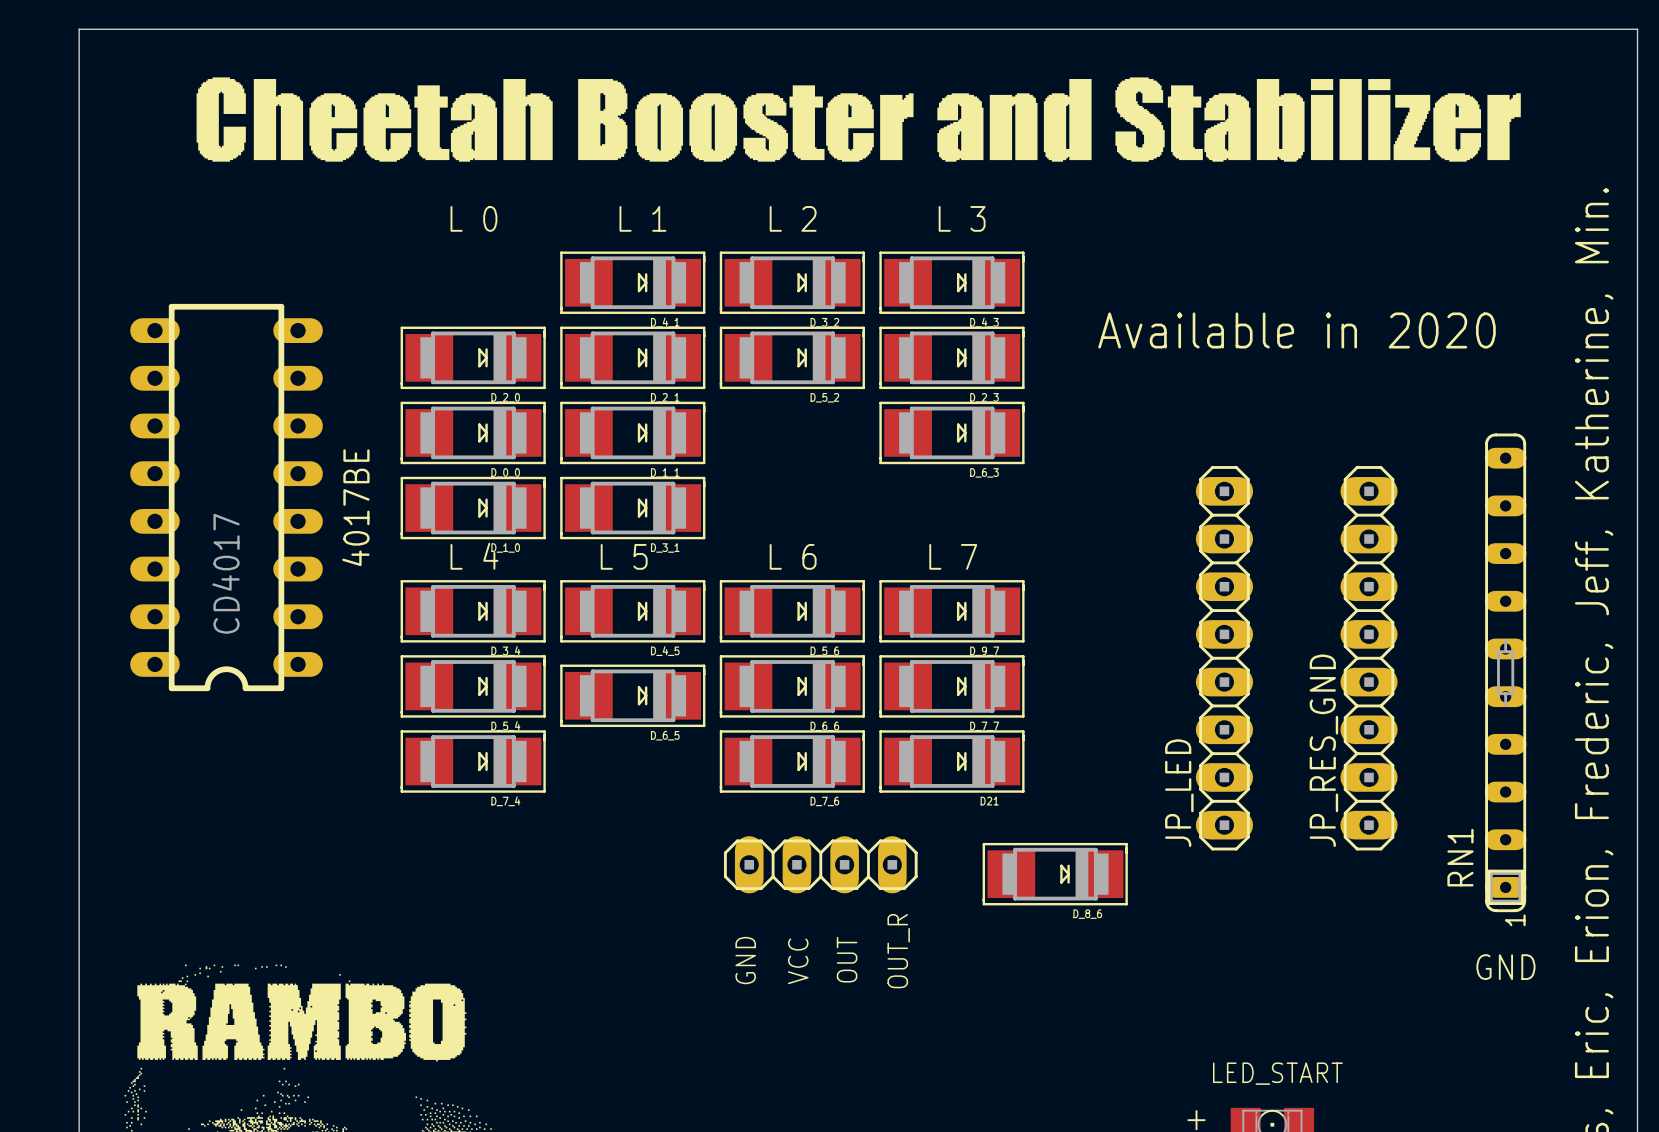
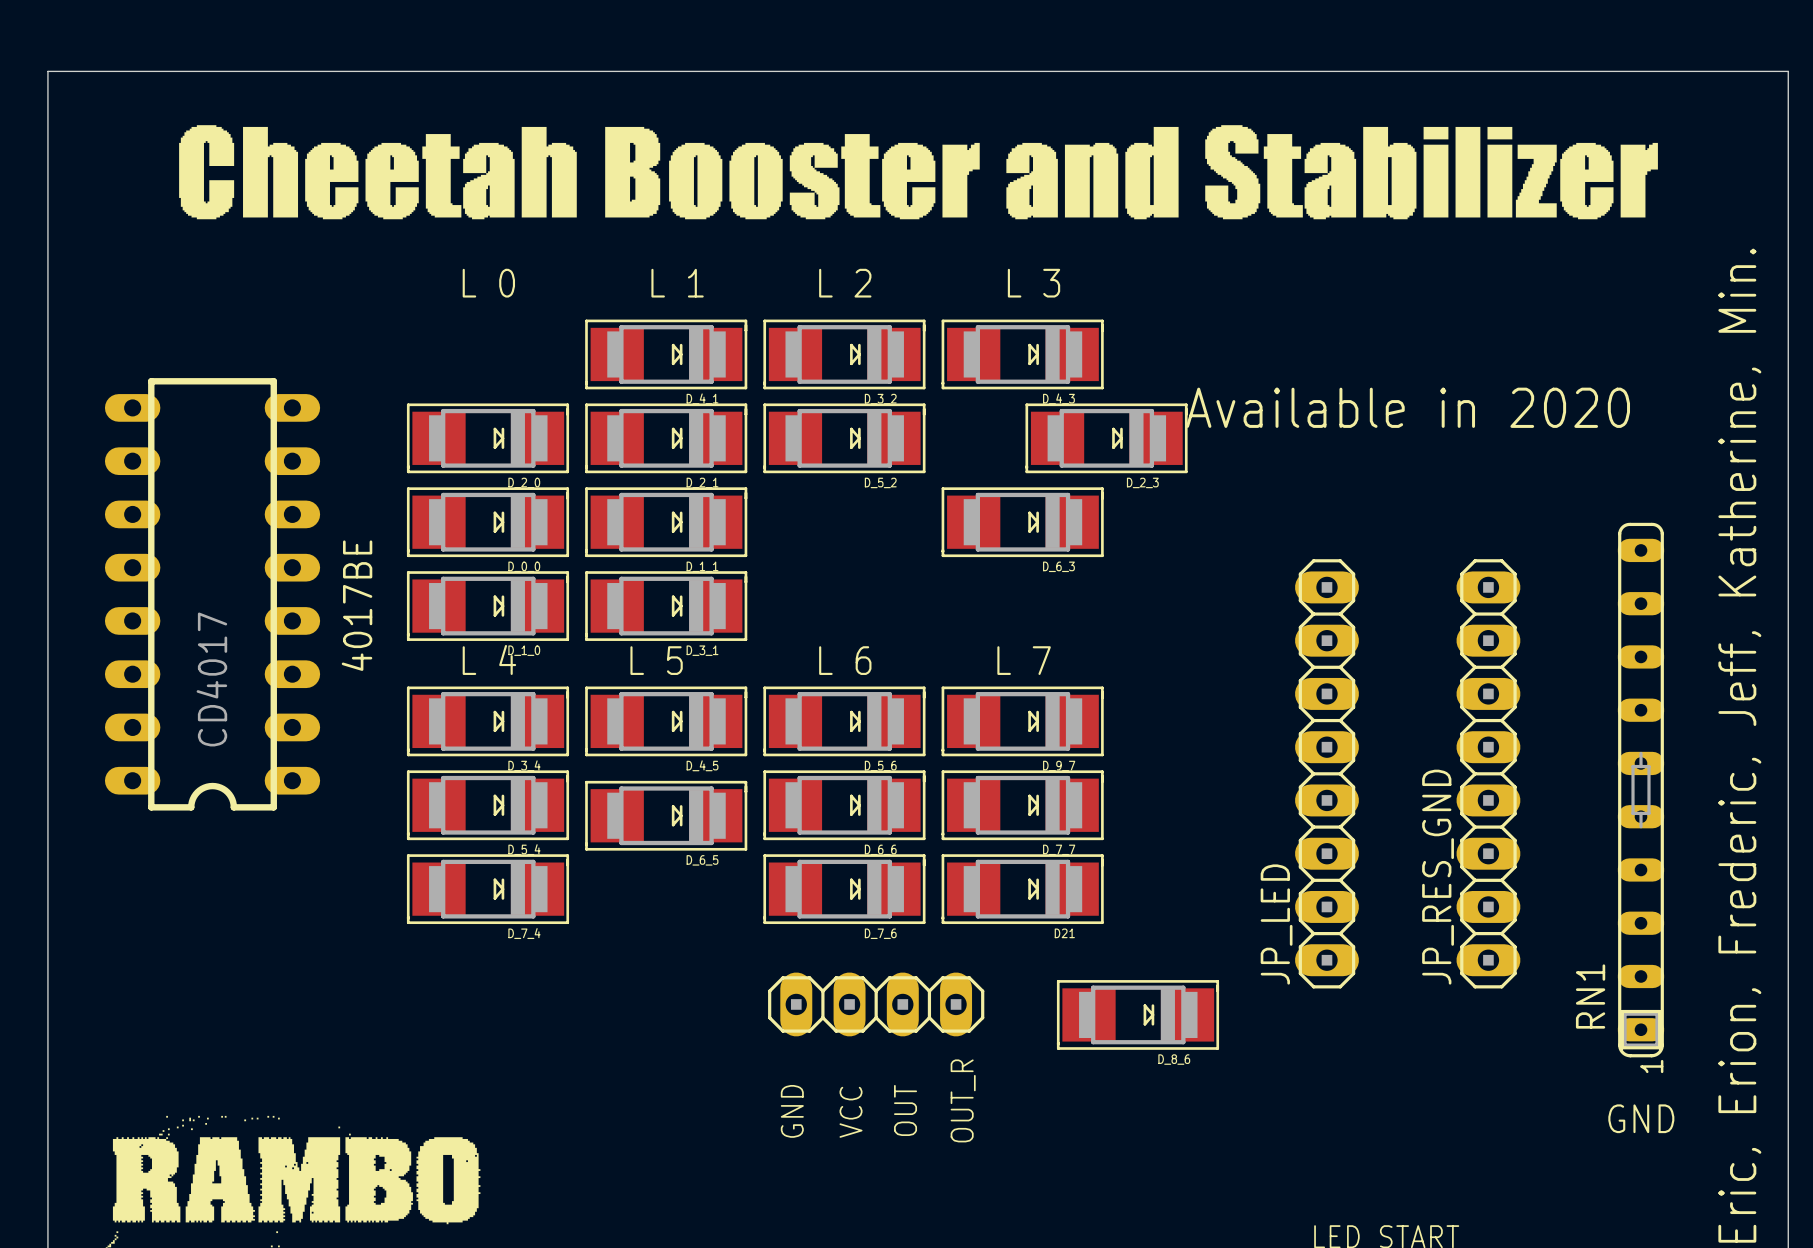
D_2_3 position: (951, 357) -> (1106, 438)

